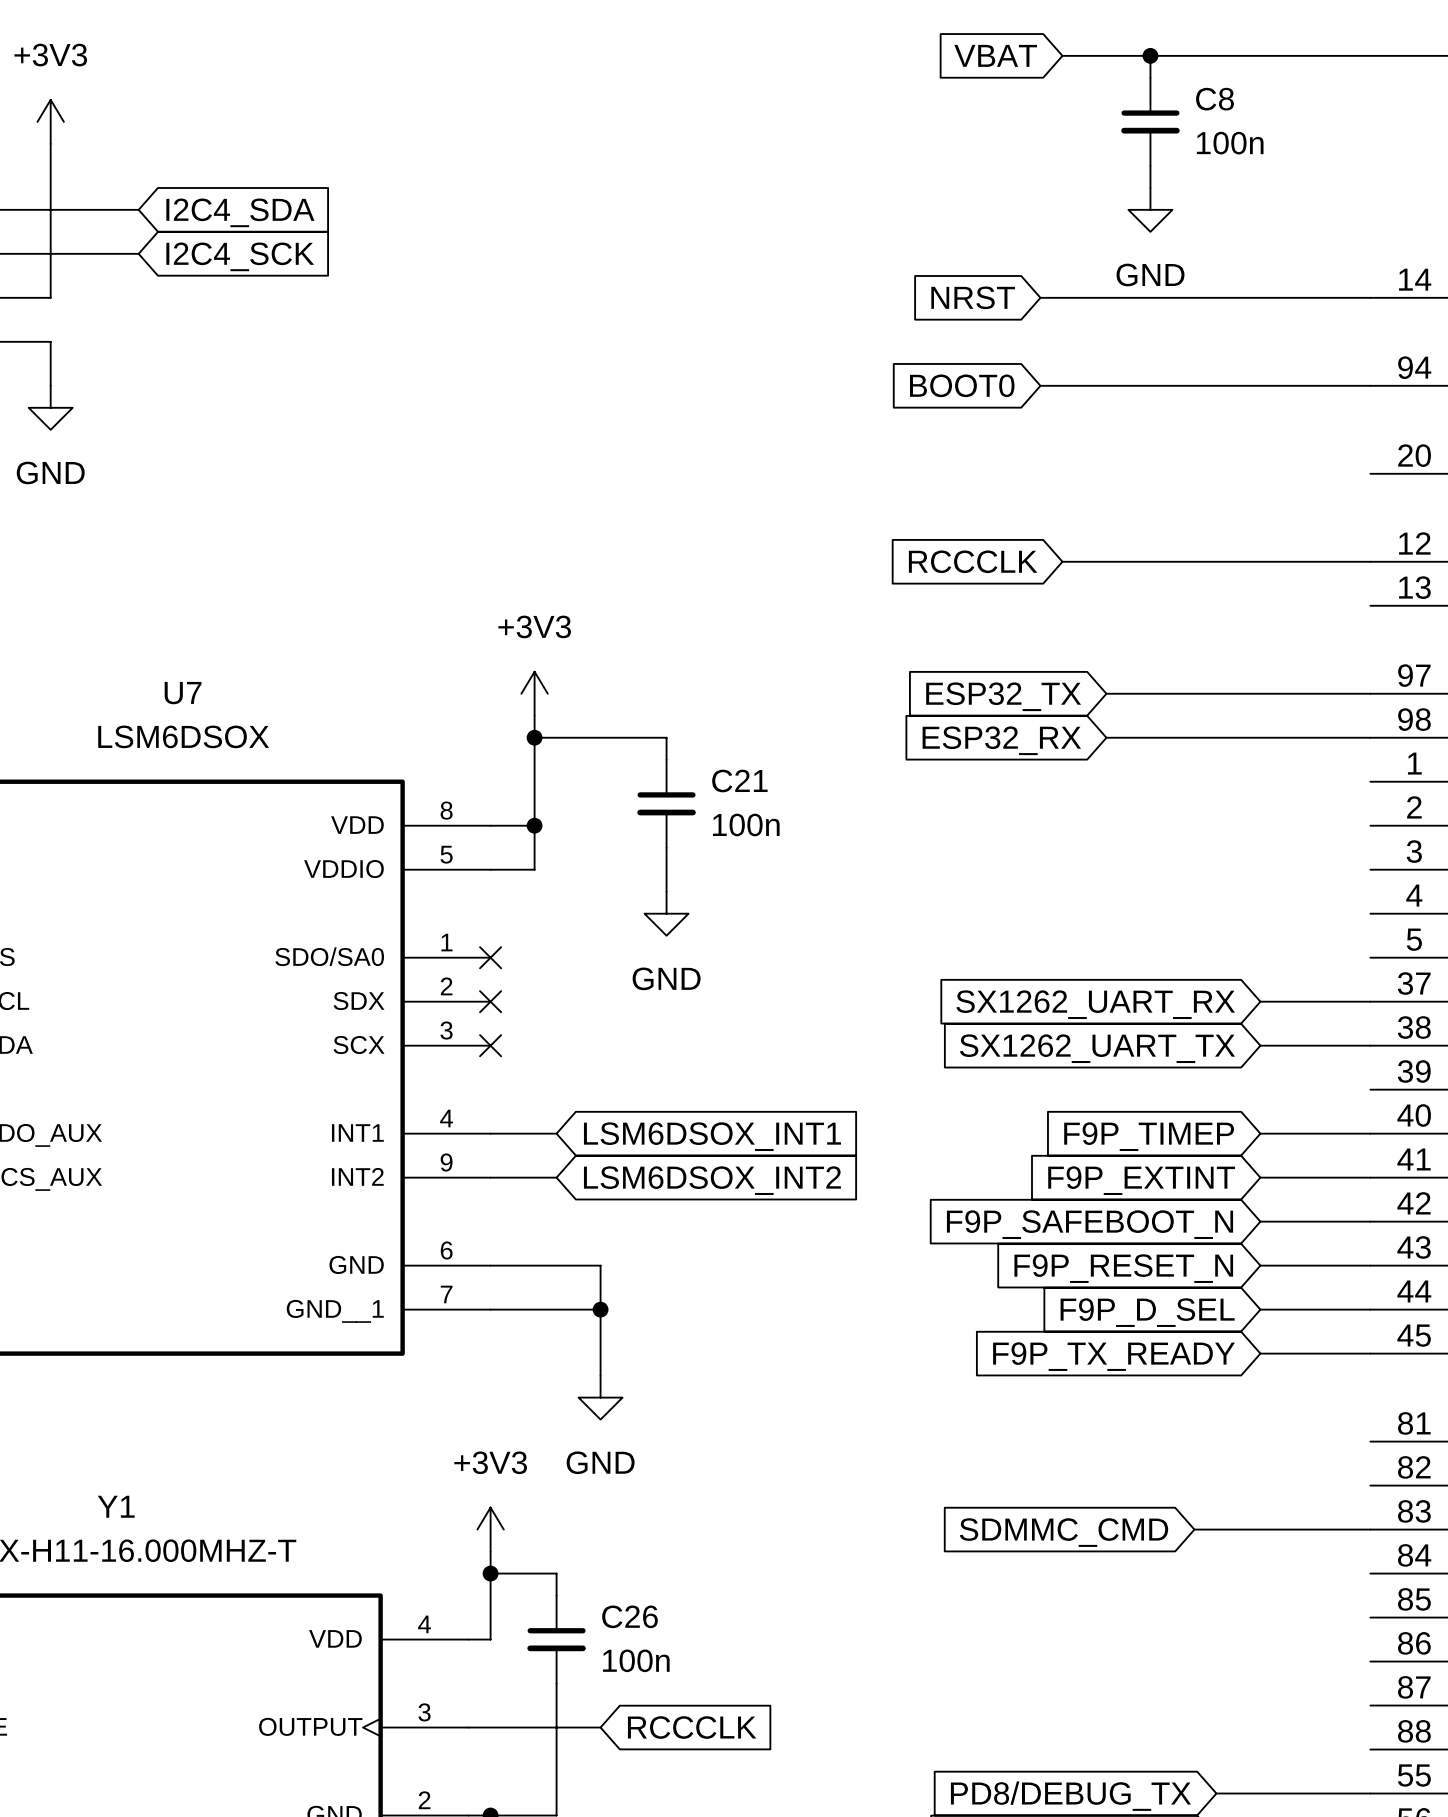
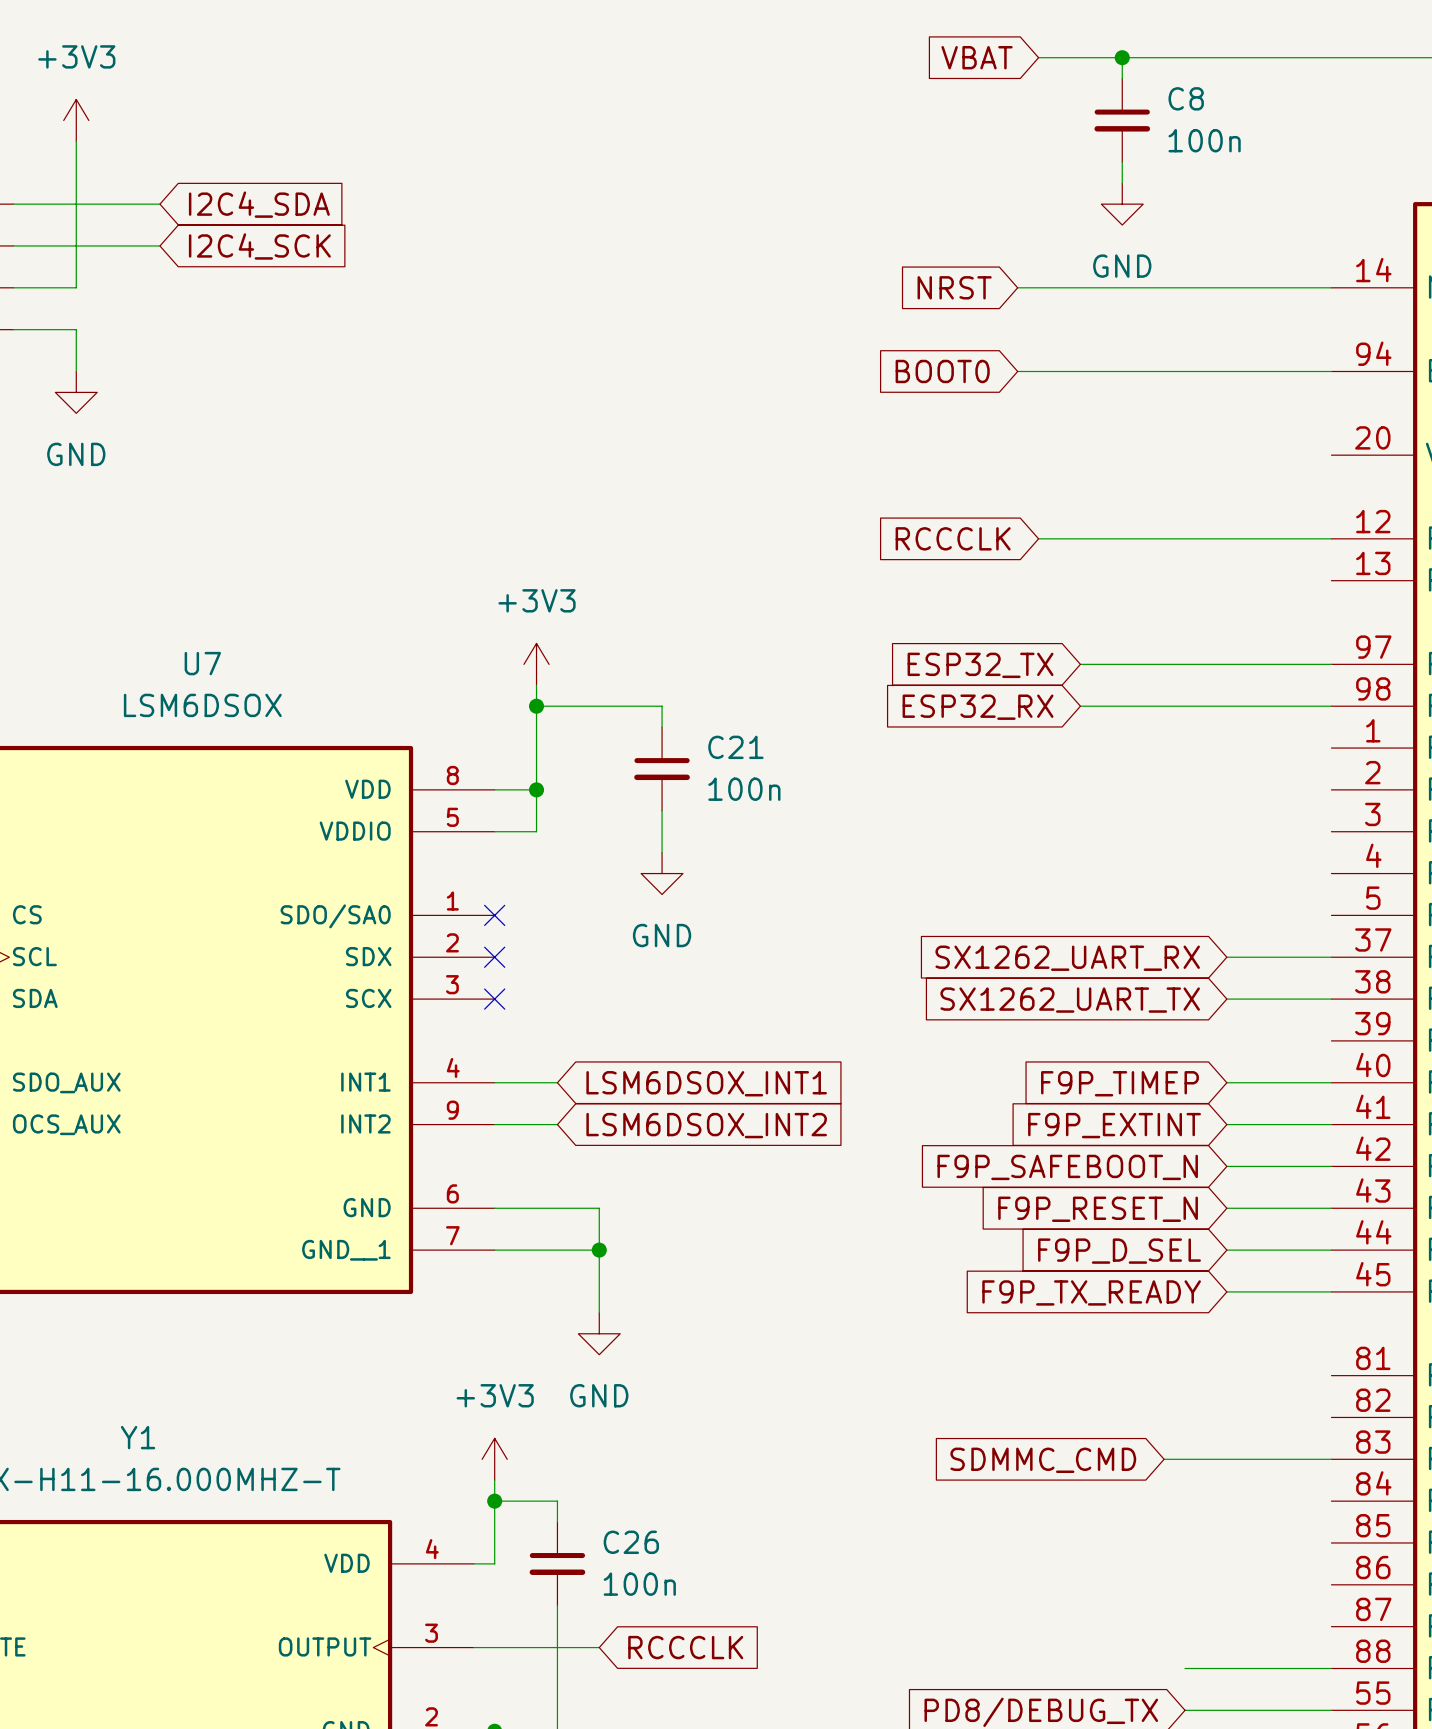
wire: none -> (1185, 1668) (1331, 1668)

